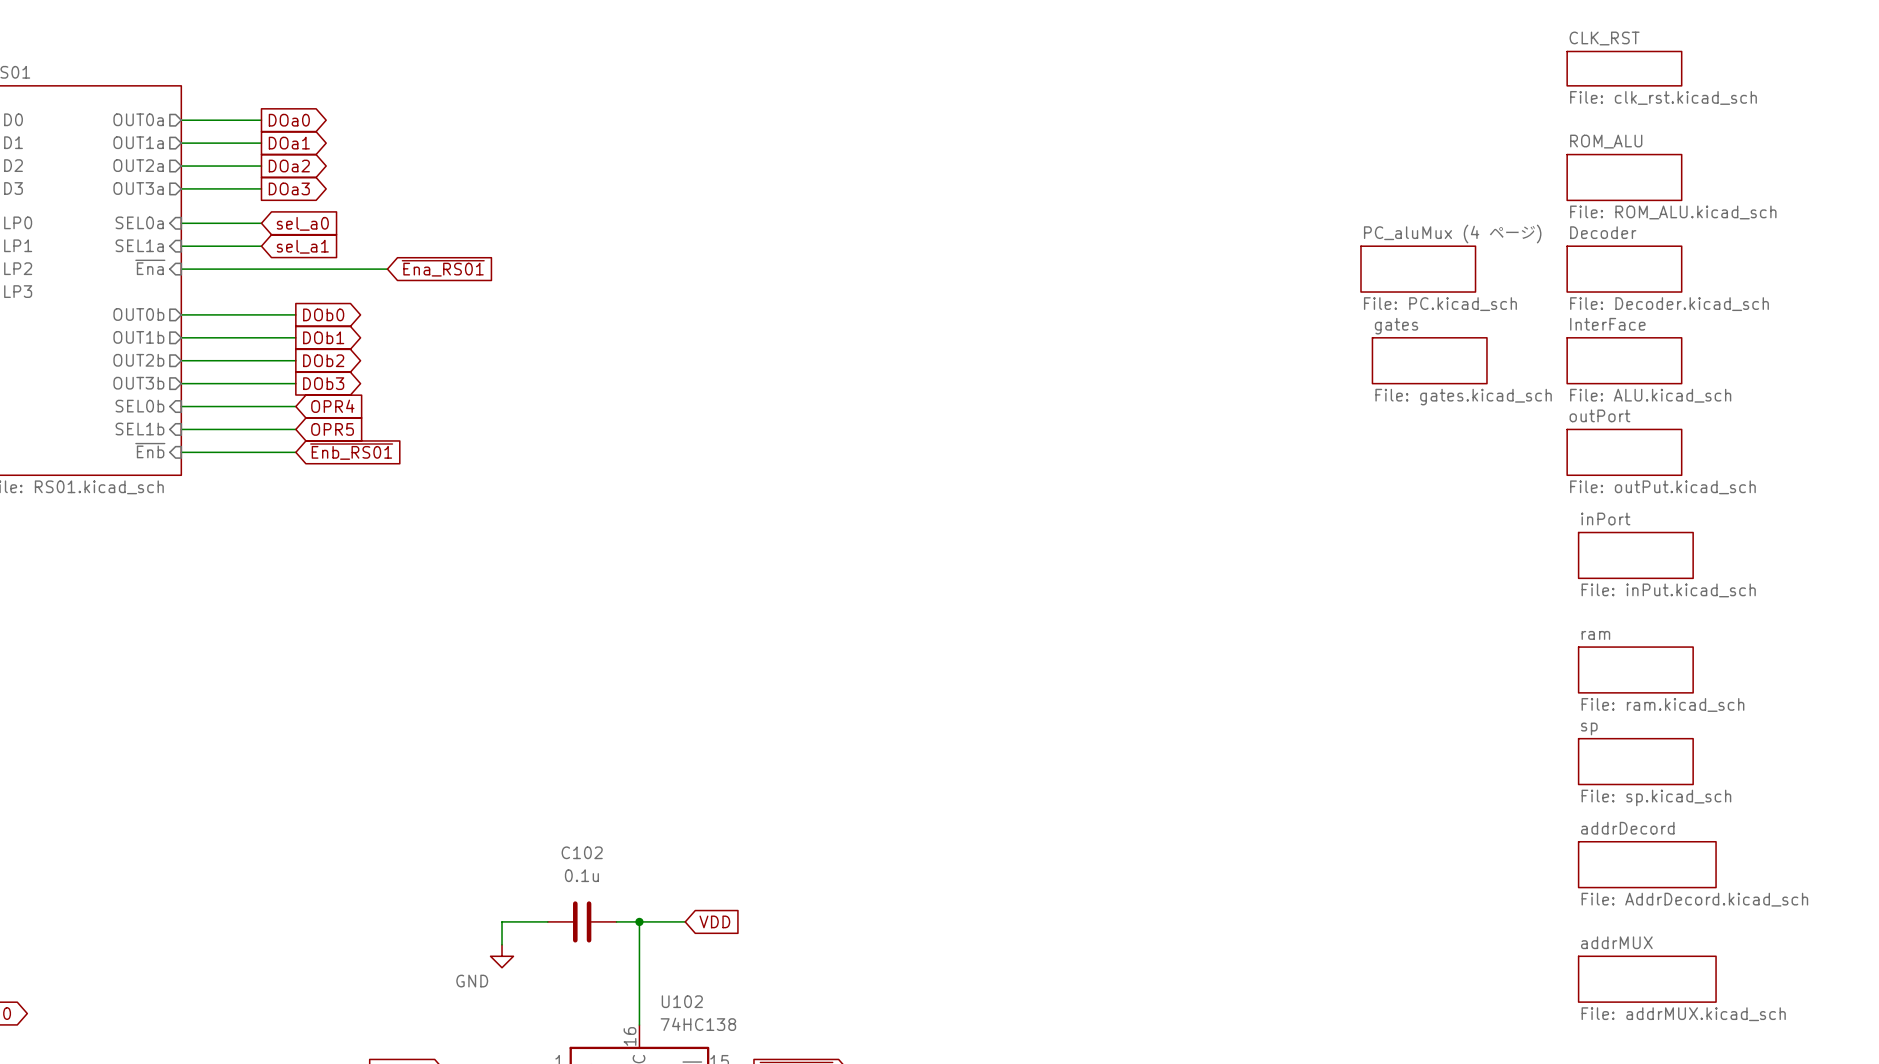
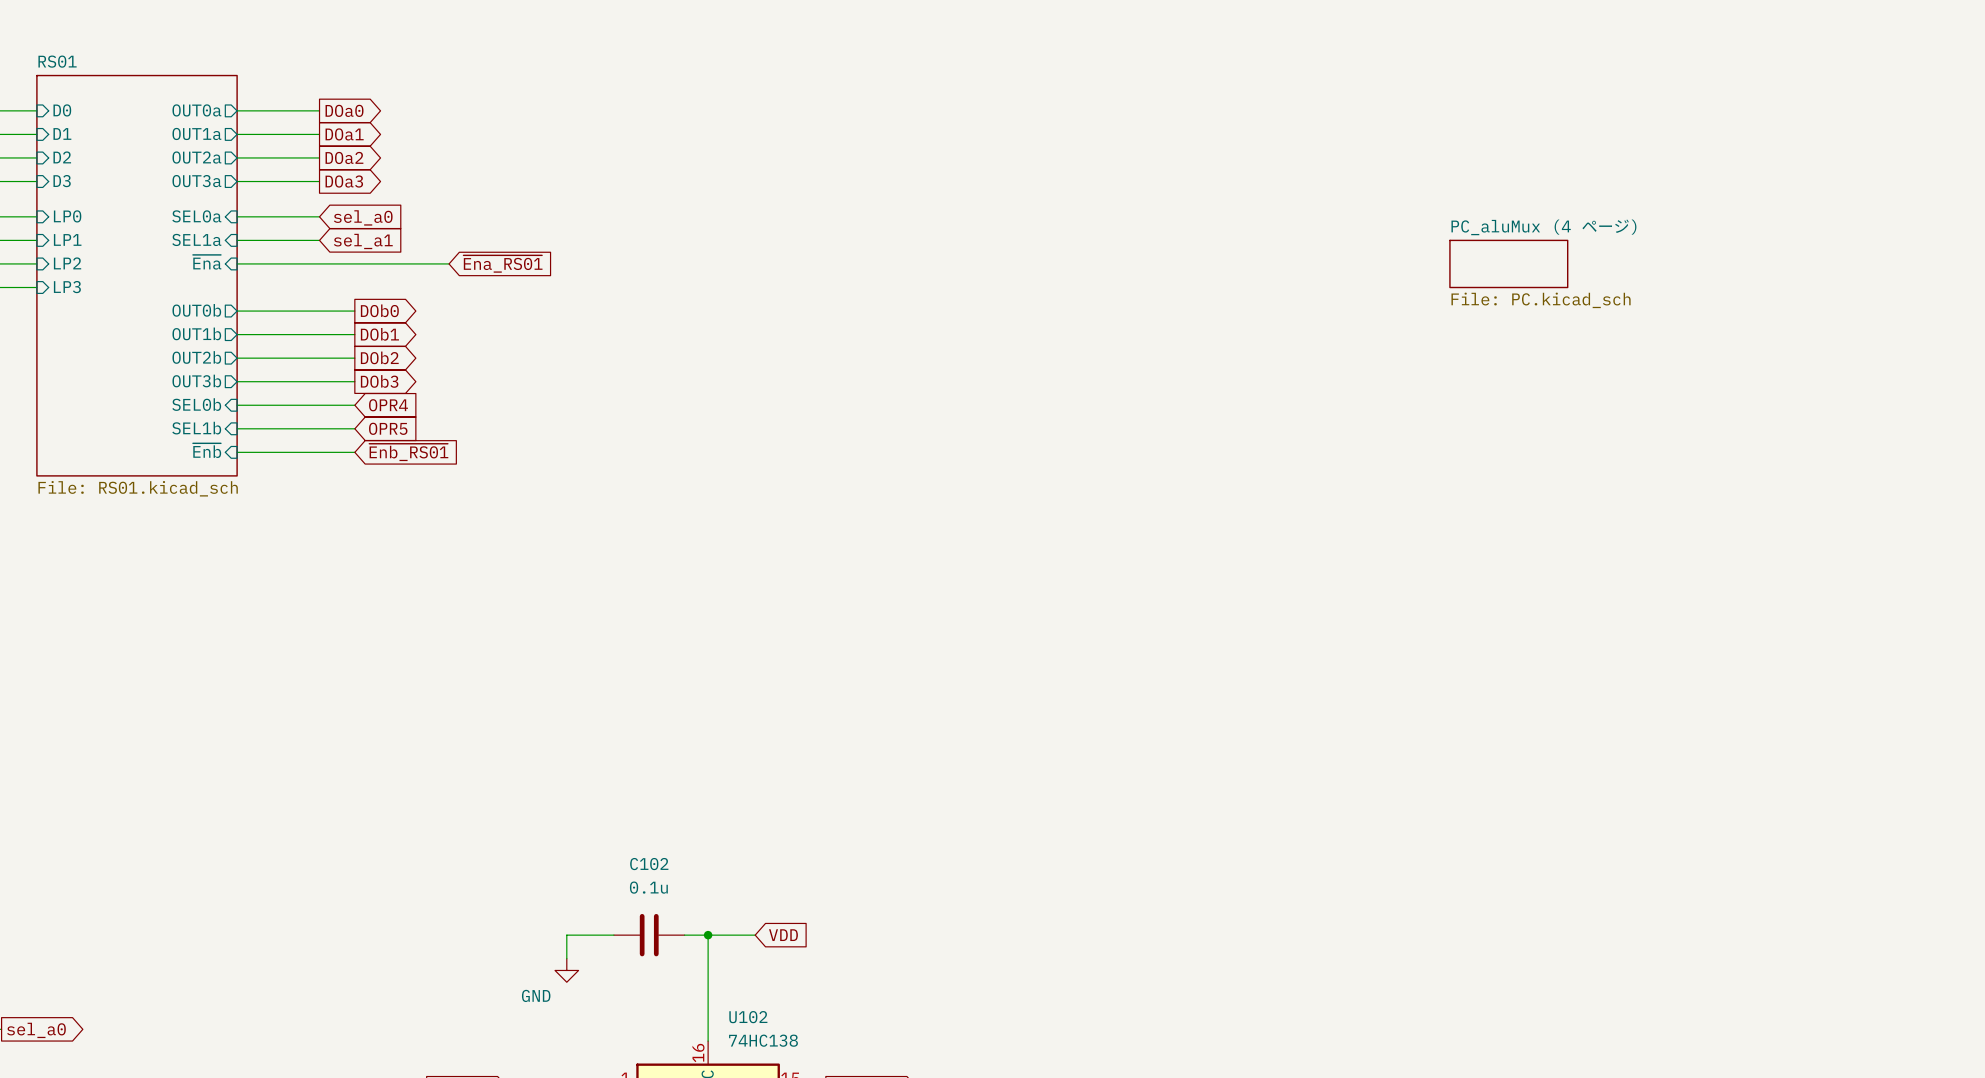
sheet CLK_RST: File: clk_rst.kicad_sch (1624, 68) -> none
sheet ROM_ALU: File: ROM_ALU.kicad_sch (1624, 177) -> none
sheet Decoder: File: Decoder.kicad_sch (1624, 269) -> none
sheet gates: File: gates.kicad_sch (1429, 360) -> none
sheet InterFace: File: ALU.kicad_sch (1624, 360) -> none
sheet outPort: File: outPut.kicad_sch (1624, 452) -> none
sheet inPort: File: inPut.kicad_sch (1635, 555) -> none
sheet ram: File: ram.kicad_sch (1635, 669) -> none
sheet sp: File: sp.kicad_sch (1635, 761) -> none
sheet addrDecord: File: AddrDecord.kicad_sch (1647, 864) -> none
sheet addrMUX: File: addrMUX.kicad_sch (1647, 979) -> none

